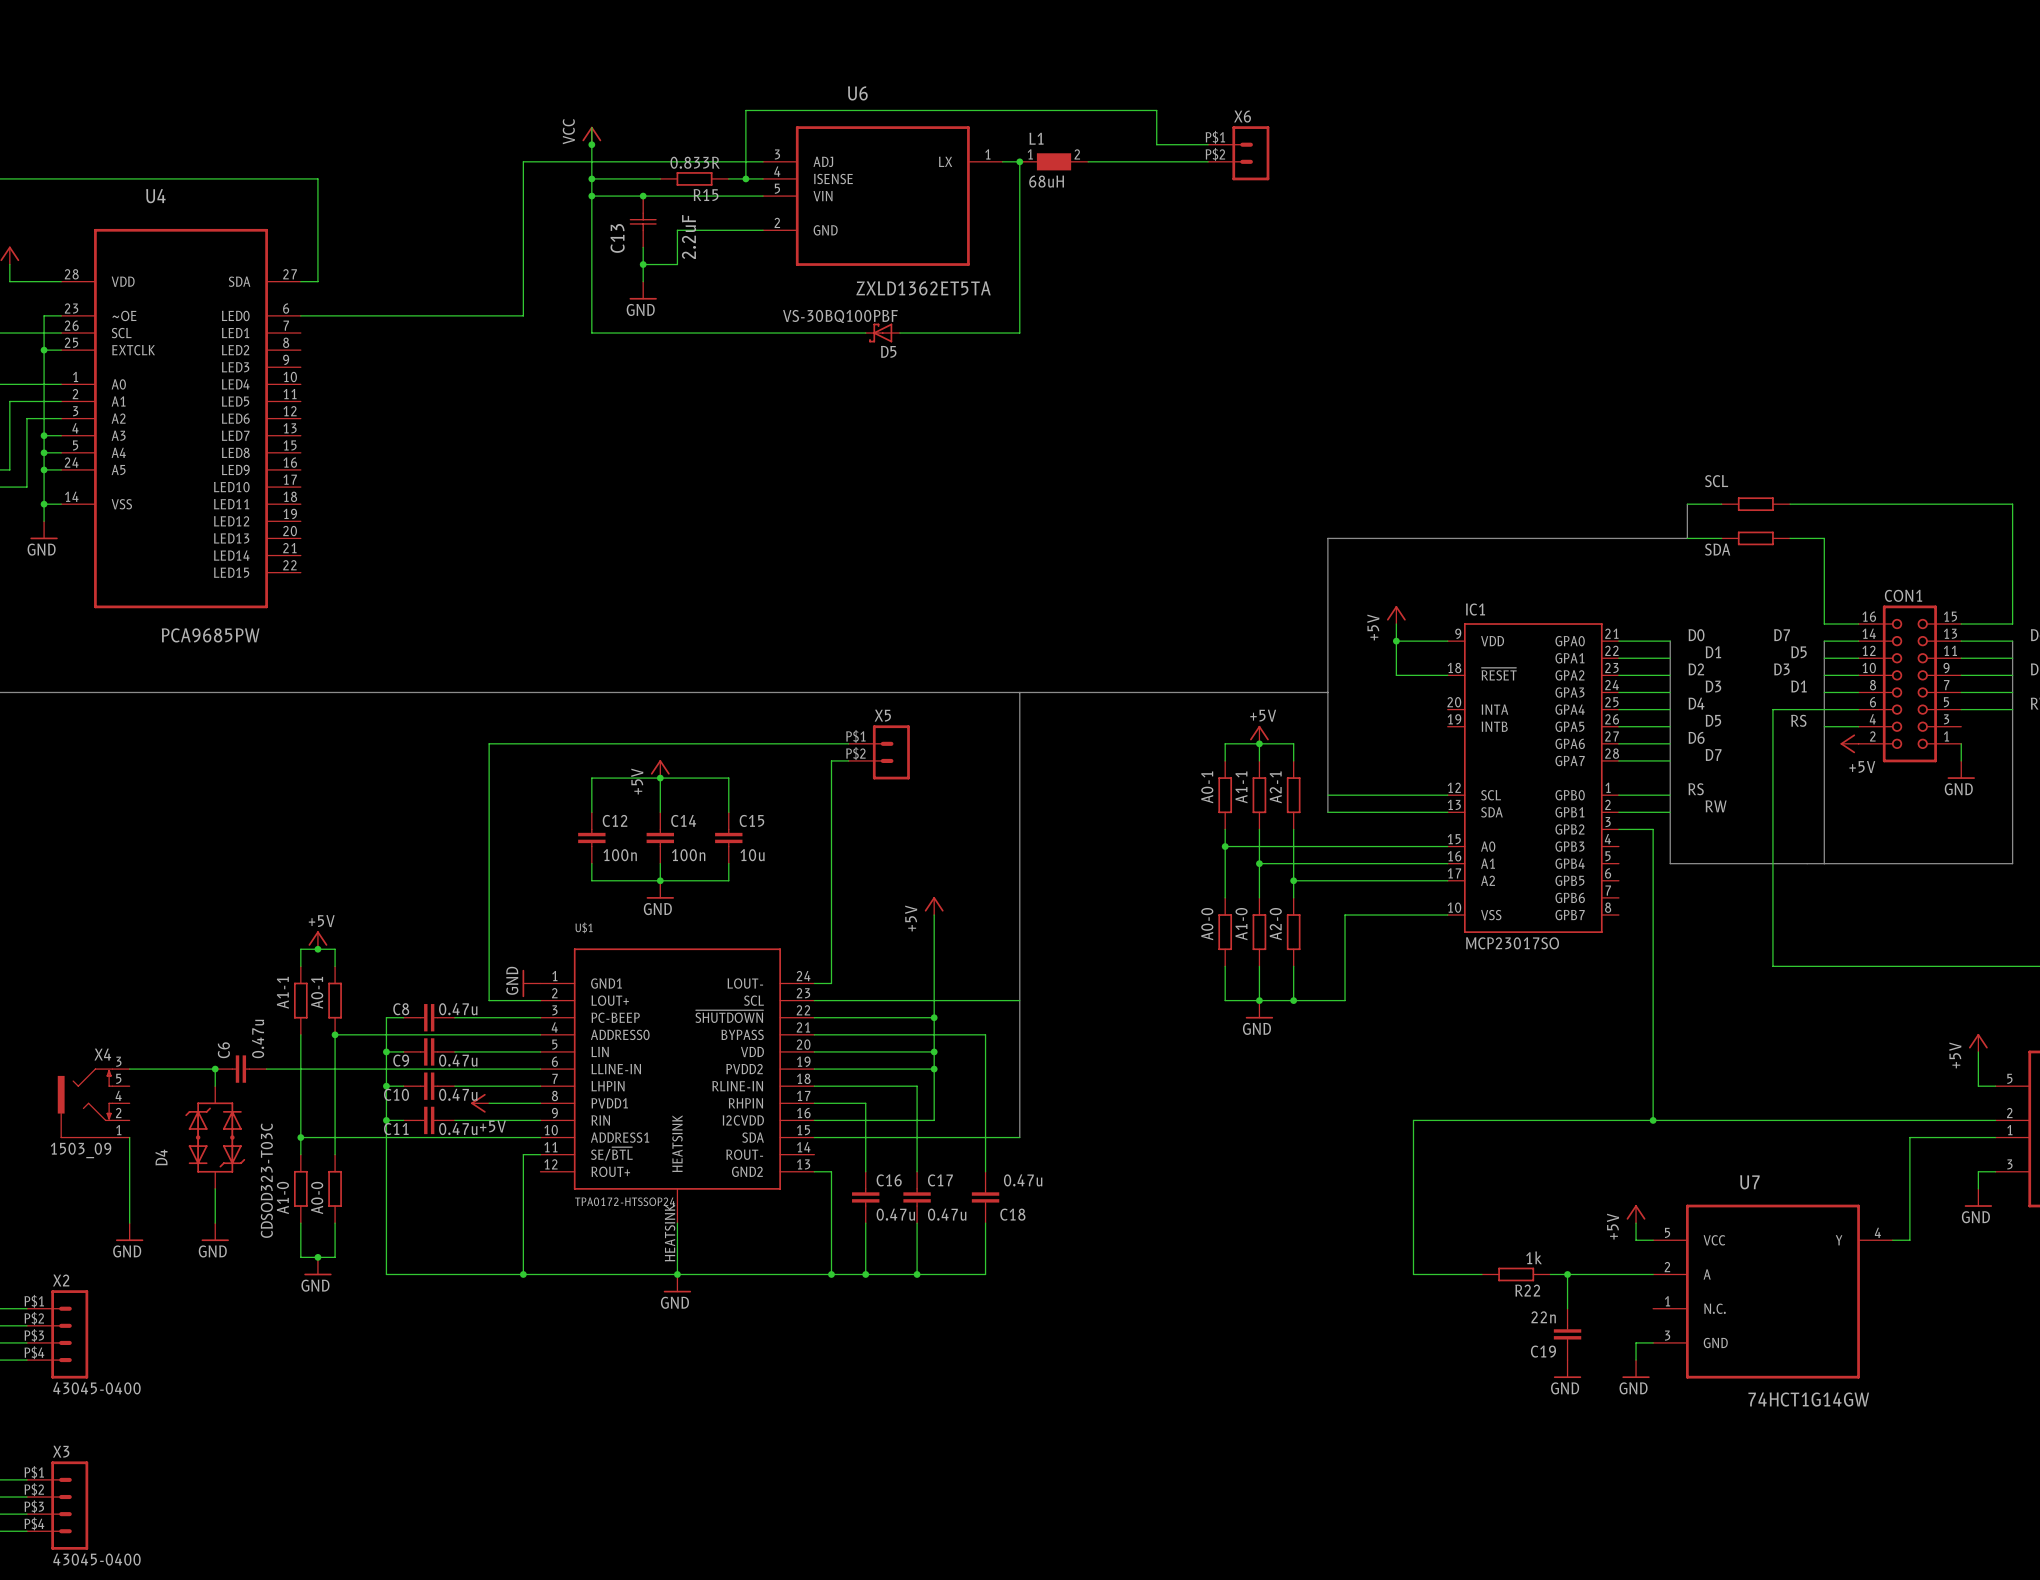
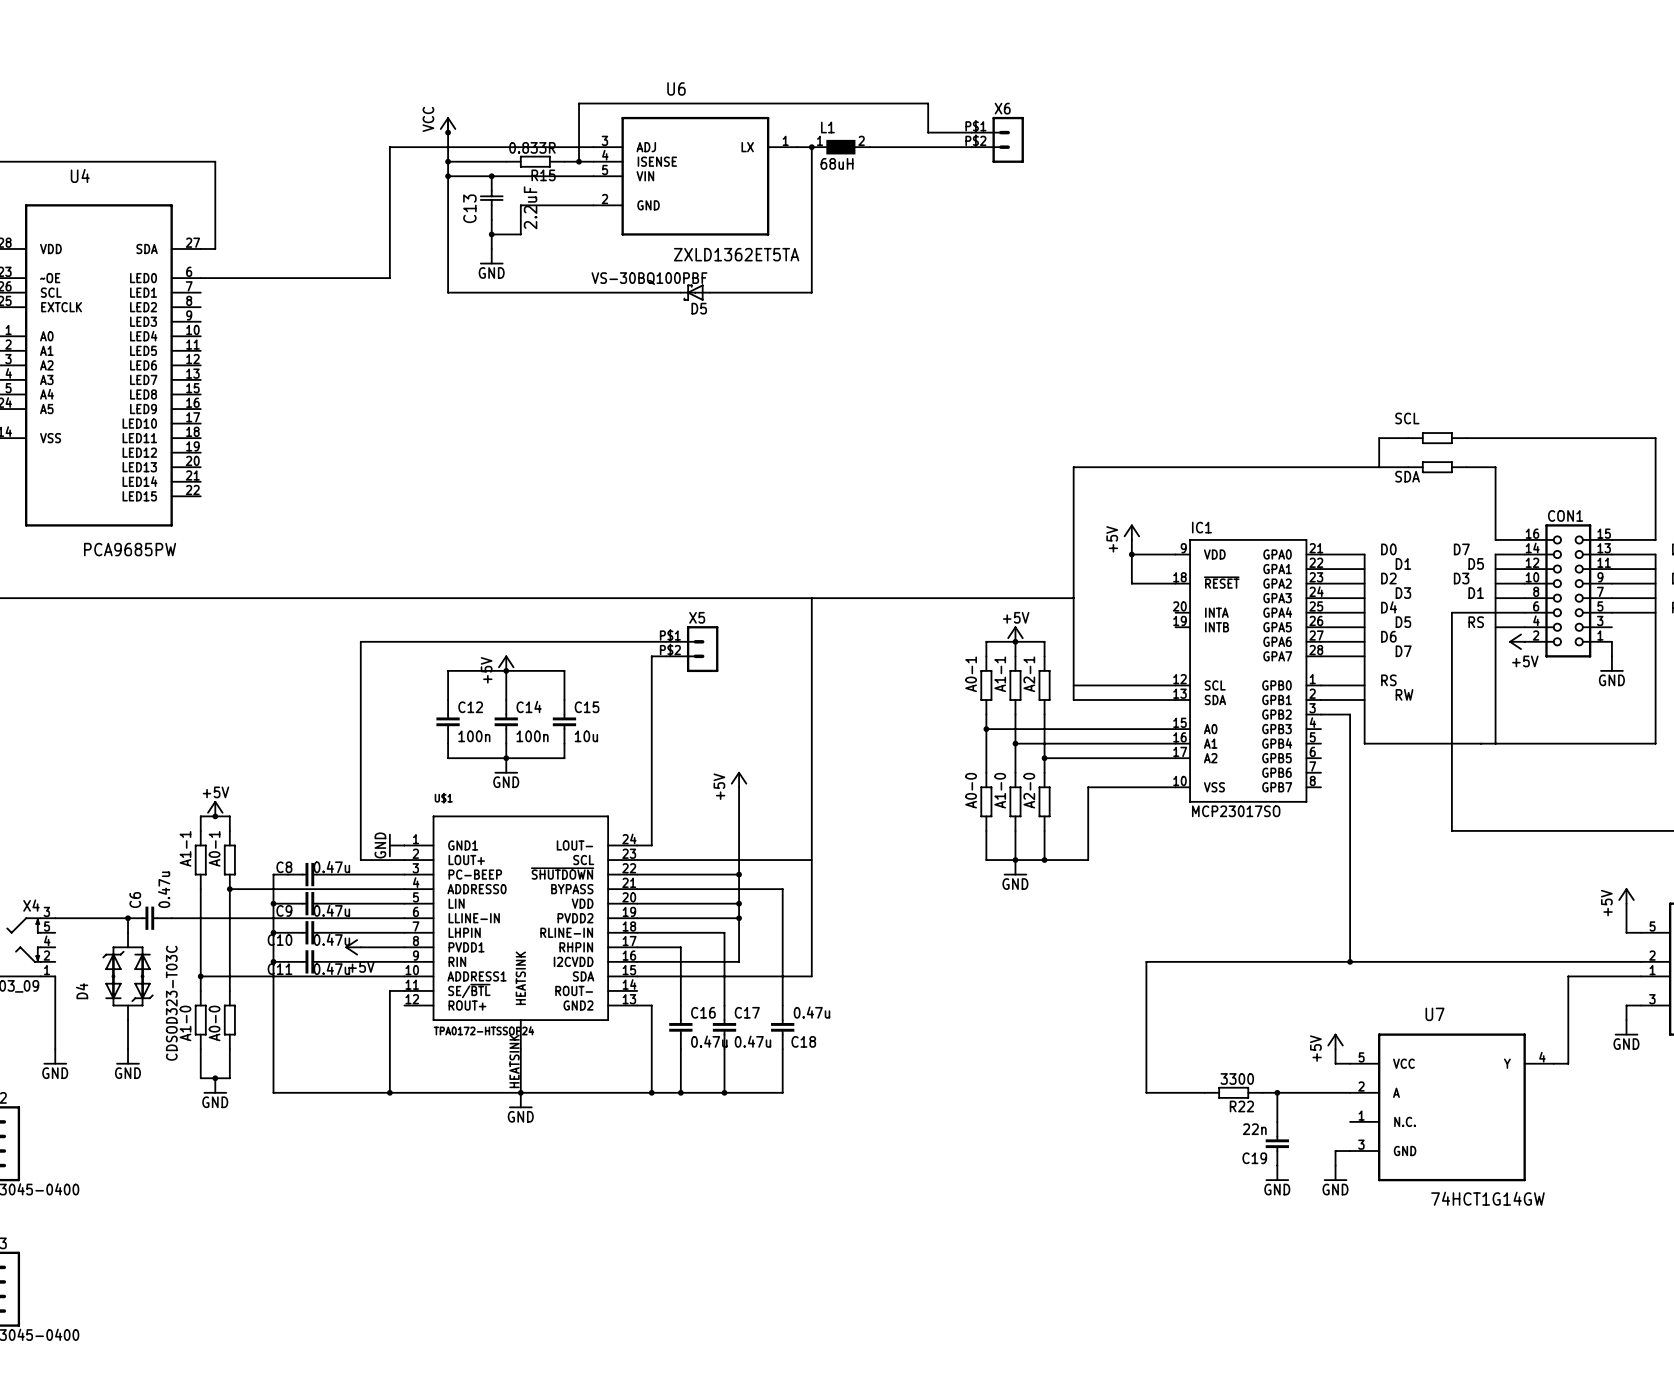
R22 value: 1k (1534, 1257) -> 3300 (1237, 1078)

